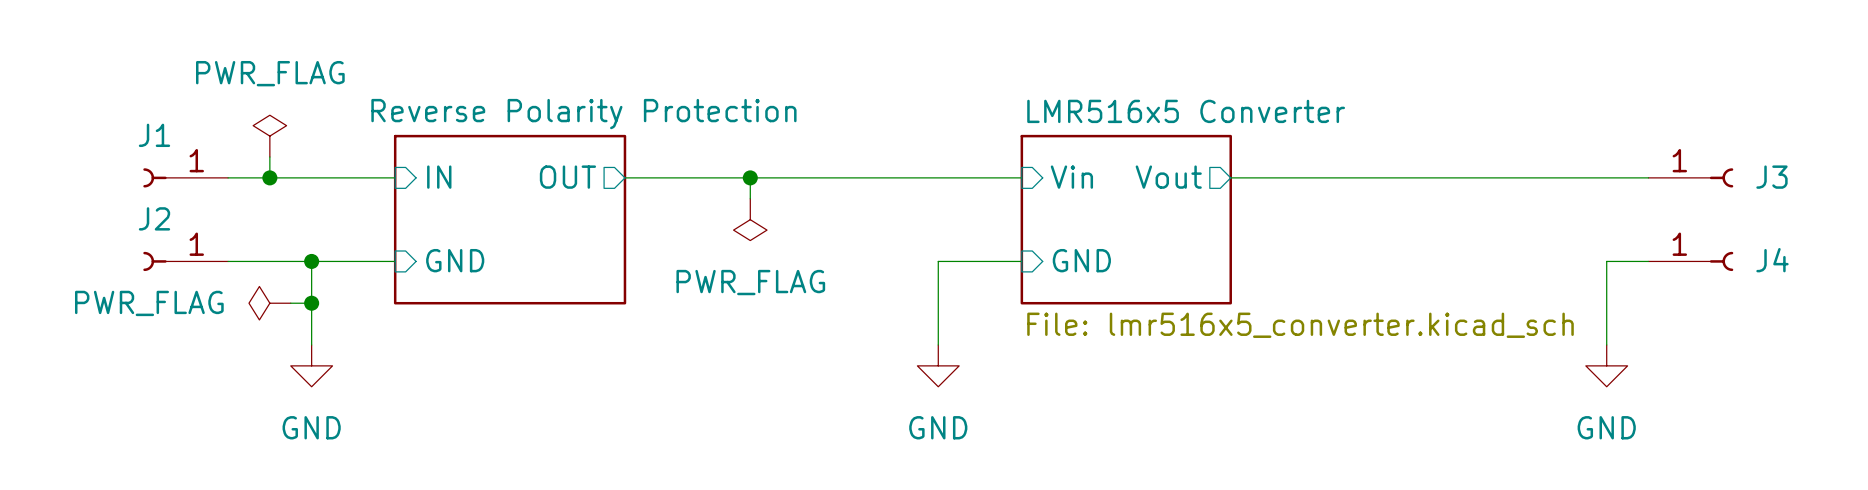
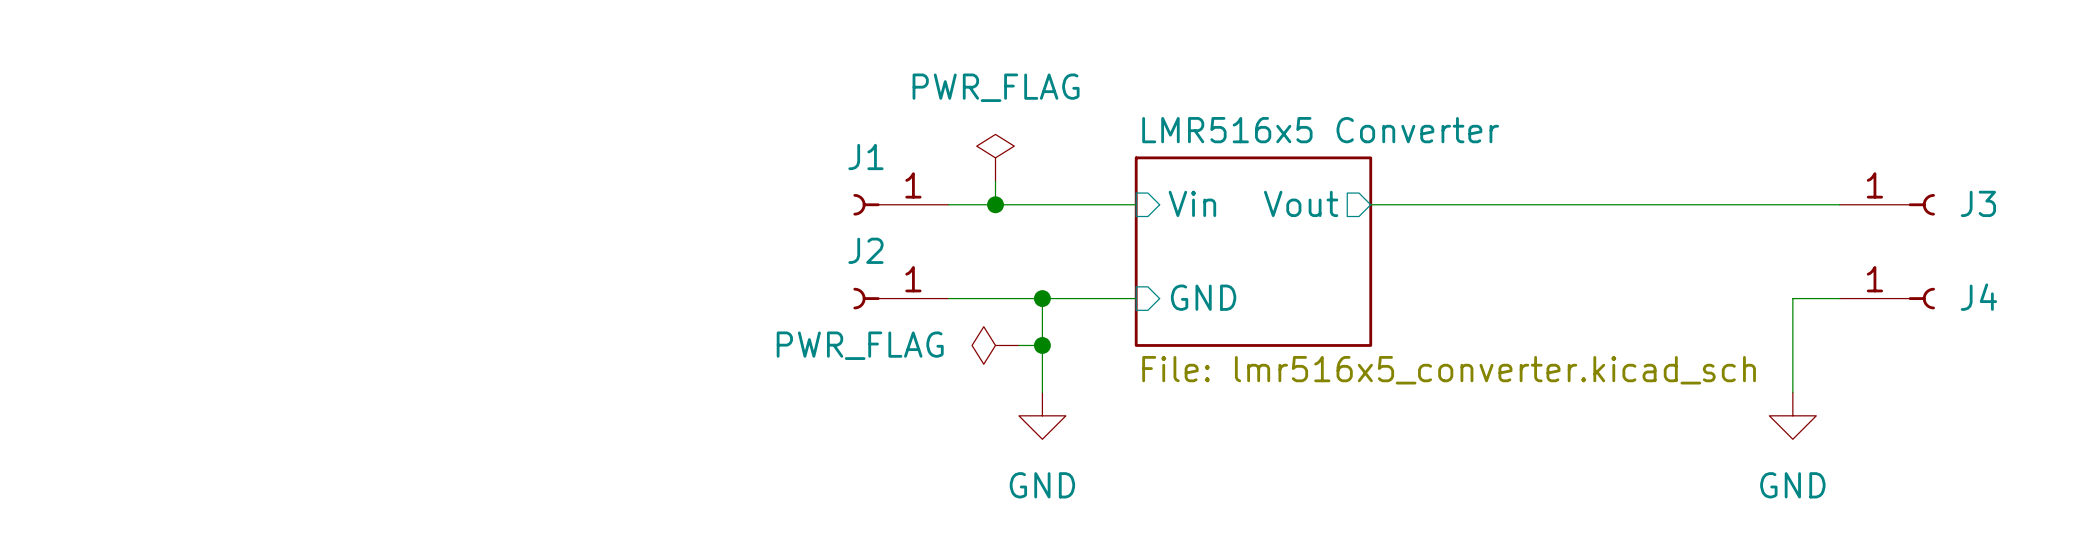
power symbol: PWR_FLAG (269, 136) -> none
power symbol: none -> PWR_FLAG (995, 157)
wire: (269, 157) (269, 177) -> none
J1 position: (185, 177) -> (900, 204)
wire: (228, 177) (395, 177) -> none
junction: (269, 177) -> none
sheet pin: IN (439, 177) -> none
sheet pin: OUT (567, 177) -> none
wire: (624, 177) (854, 177) -> none
wire: (750, 177) (750, 198) -> (995, 181) (995, 204)
junction: (750, 177) -> none
junction: none -> (995, 204)
sheet Reverse Polarity Protection: (510, 219) -> none
power symbol: PWR_FLAG (750, 219) -> none
sheet pin: GND (455, 260) -> none
J2 position: (185, 261) -> (900, 298)
wire: (228, 261) (395, 261) -> none
wire: (311, 261) (311, 344) -> none
junction: (311, 261) -> none
wire: none -> (948, 298) (1042, 298)
junction: none -> (1042, 298)
power symbol: PWR_FLAG (269, 303) -> none
wire: (290, 303) (311, 303) -> none
junction: (311, 303) -> none
power symbol: none -> PWR_FLAG (995, 345)
wire: none -> (1018, 345) (1042, 345)
junction: none -> (1042, 345)
power symbol: GND (311, 365) -> none

